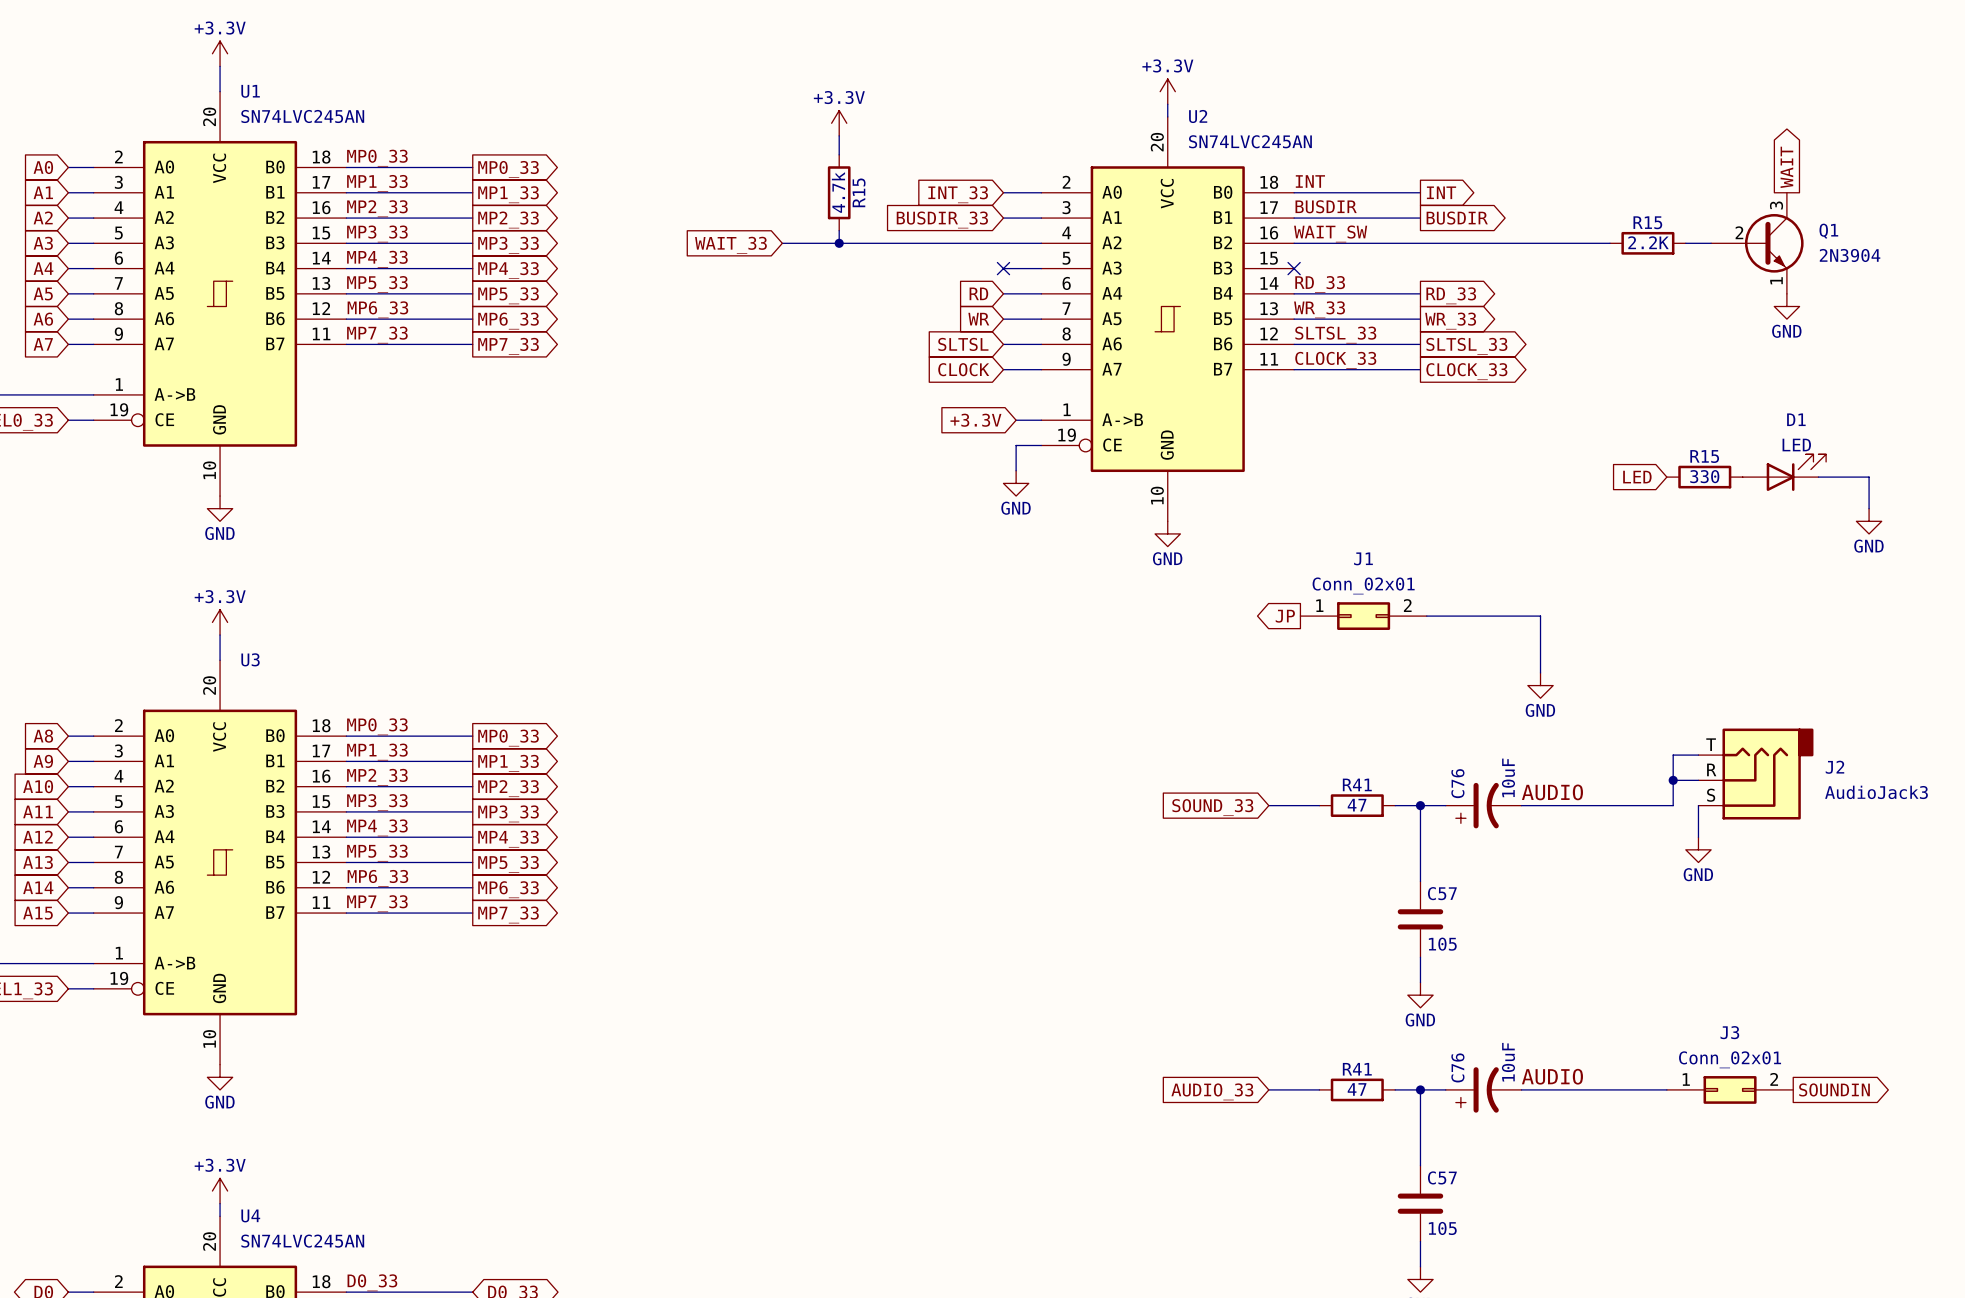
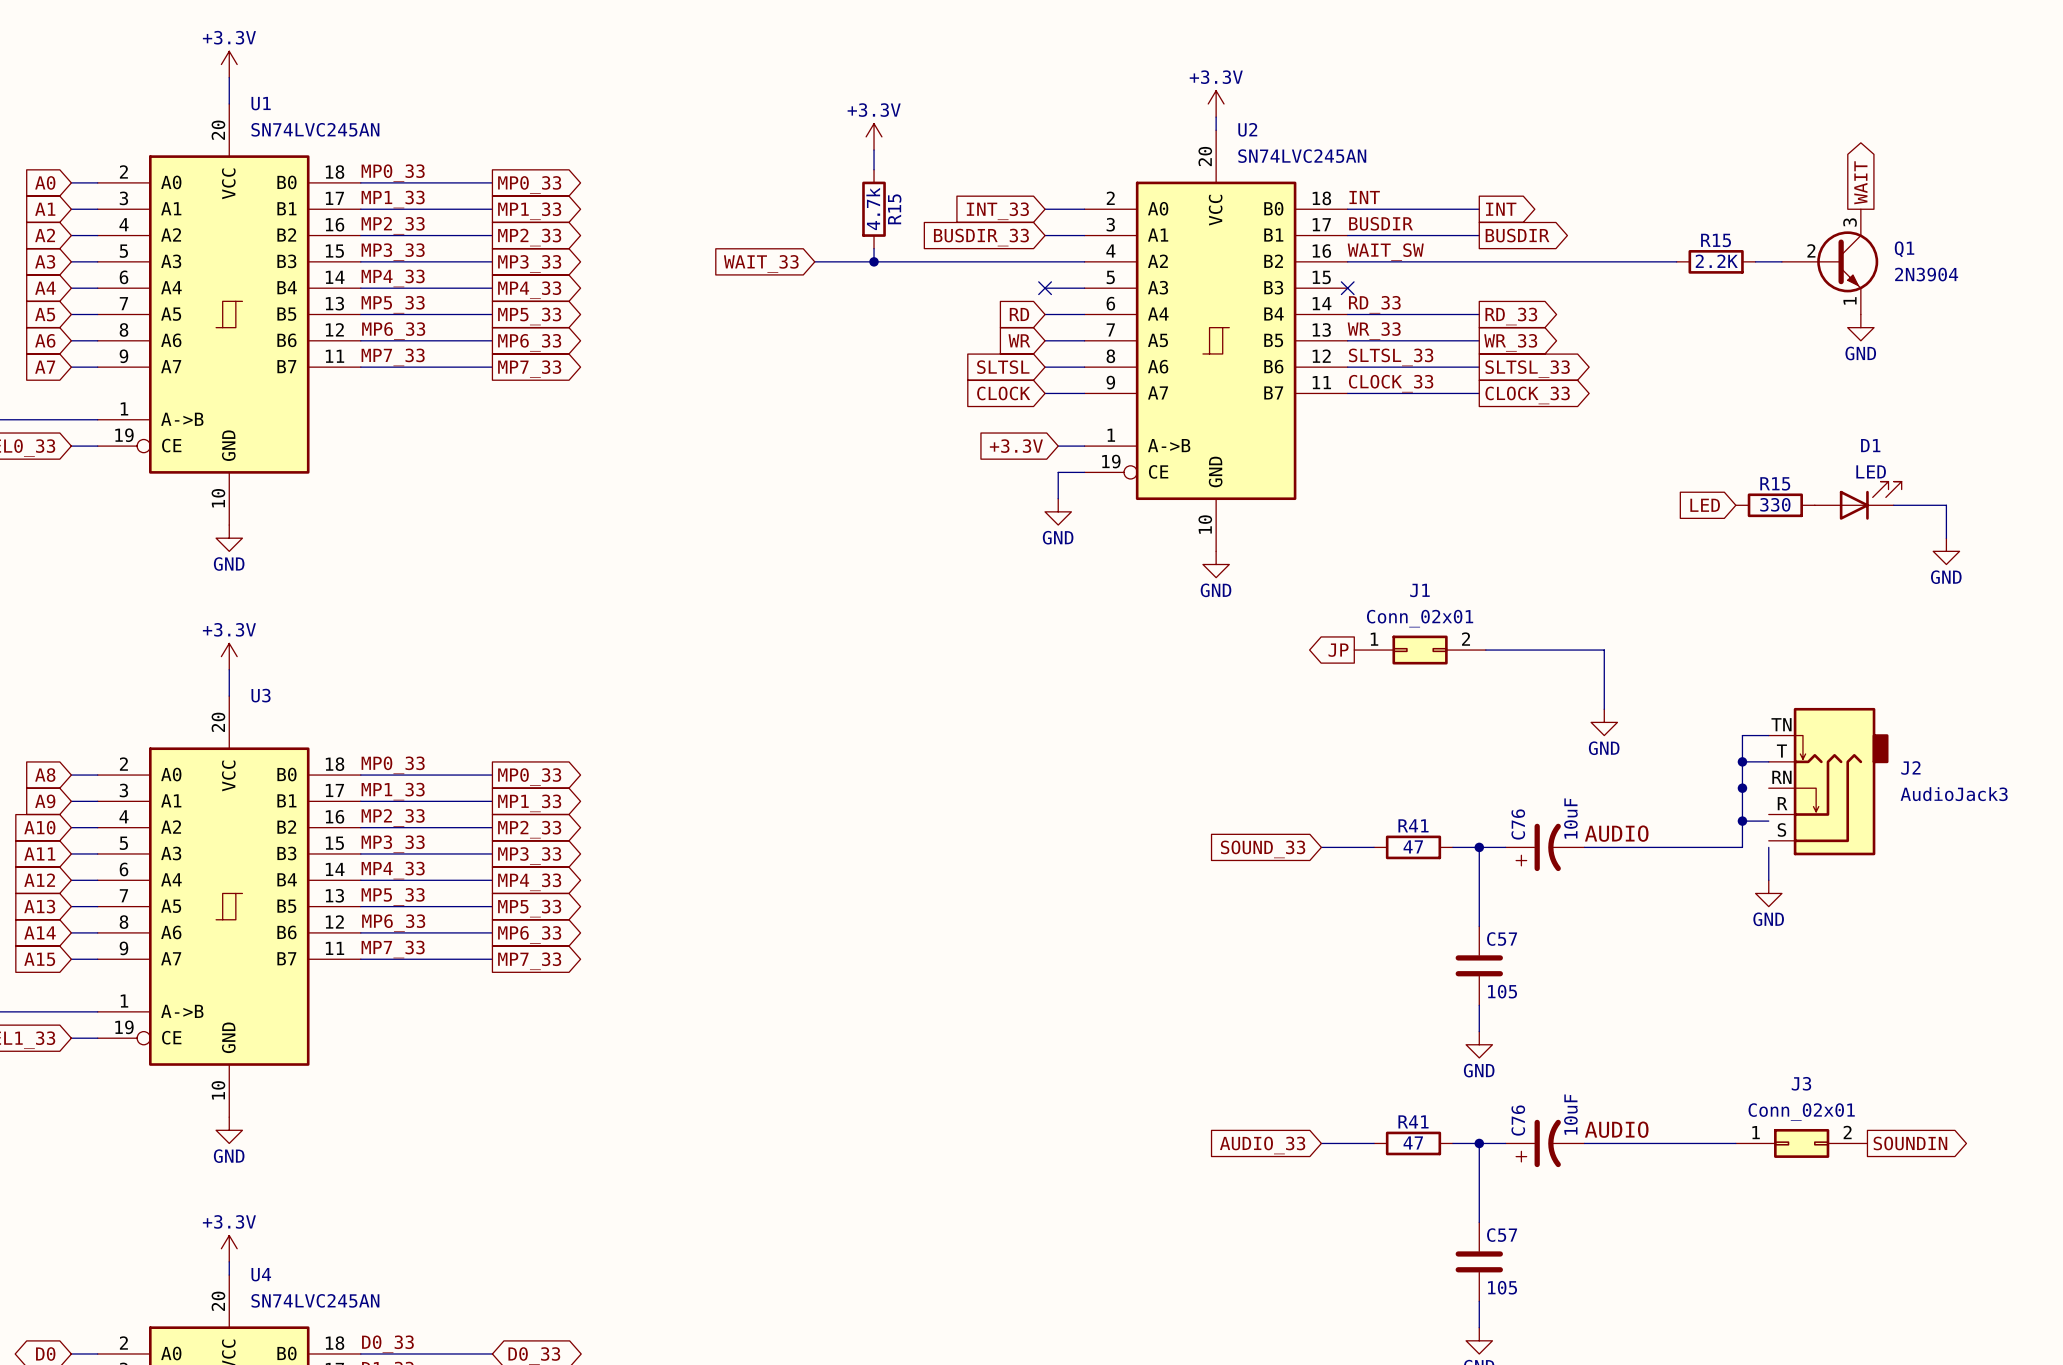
wire: none -> (1742, 761) (1768, 761)
junction: none -> (1742, 761)
J2 symbol: [1698, 728, 1814, 820] -> [1768, 707, 1889, 856]
junction: none -> (1742, 788)
wire: (1673, 755) (1698, 755) -> (1742, 794) (1742, 735) (1768, 735)

